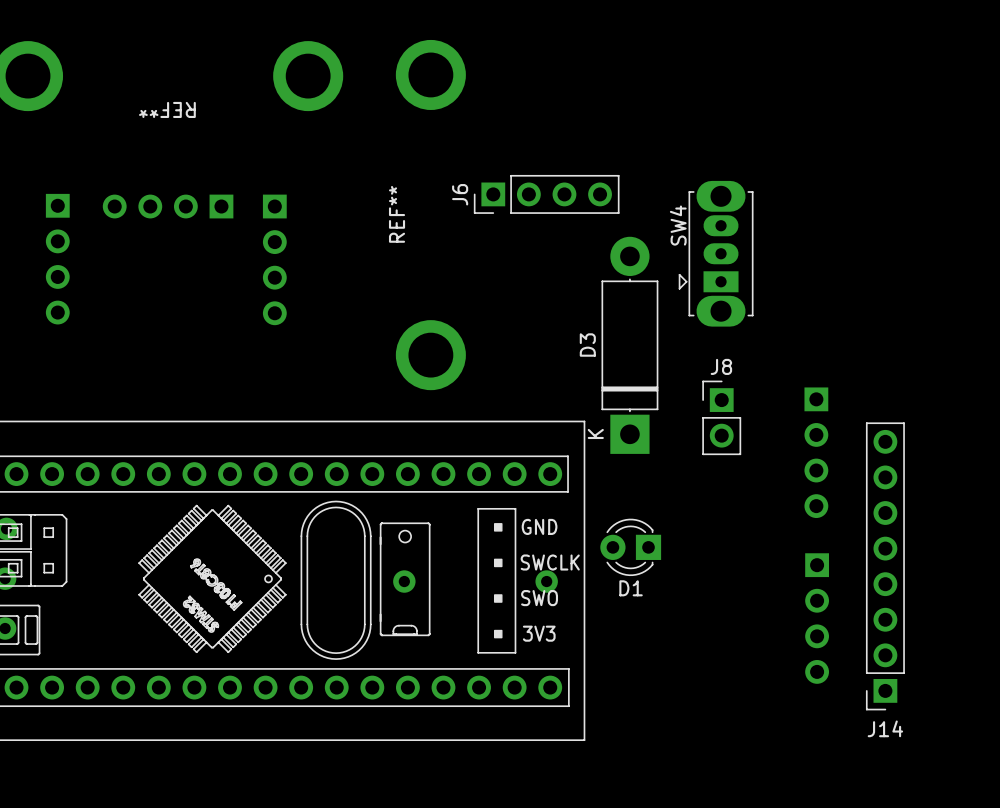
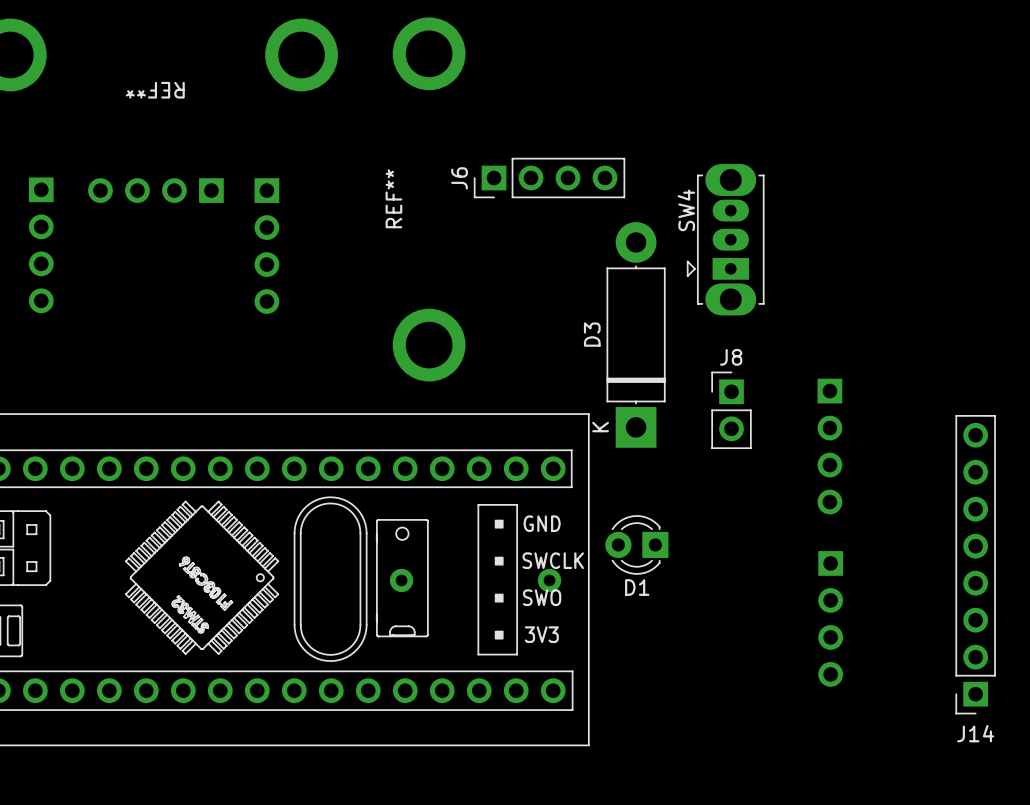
J14 position: (885, 566) -> (975, 564)

